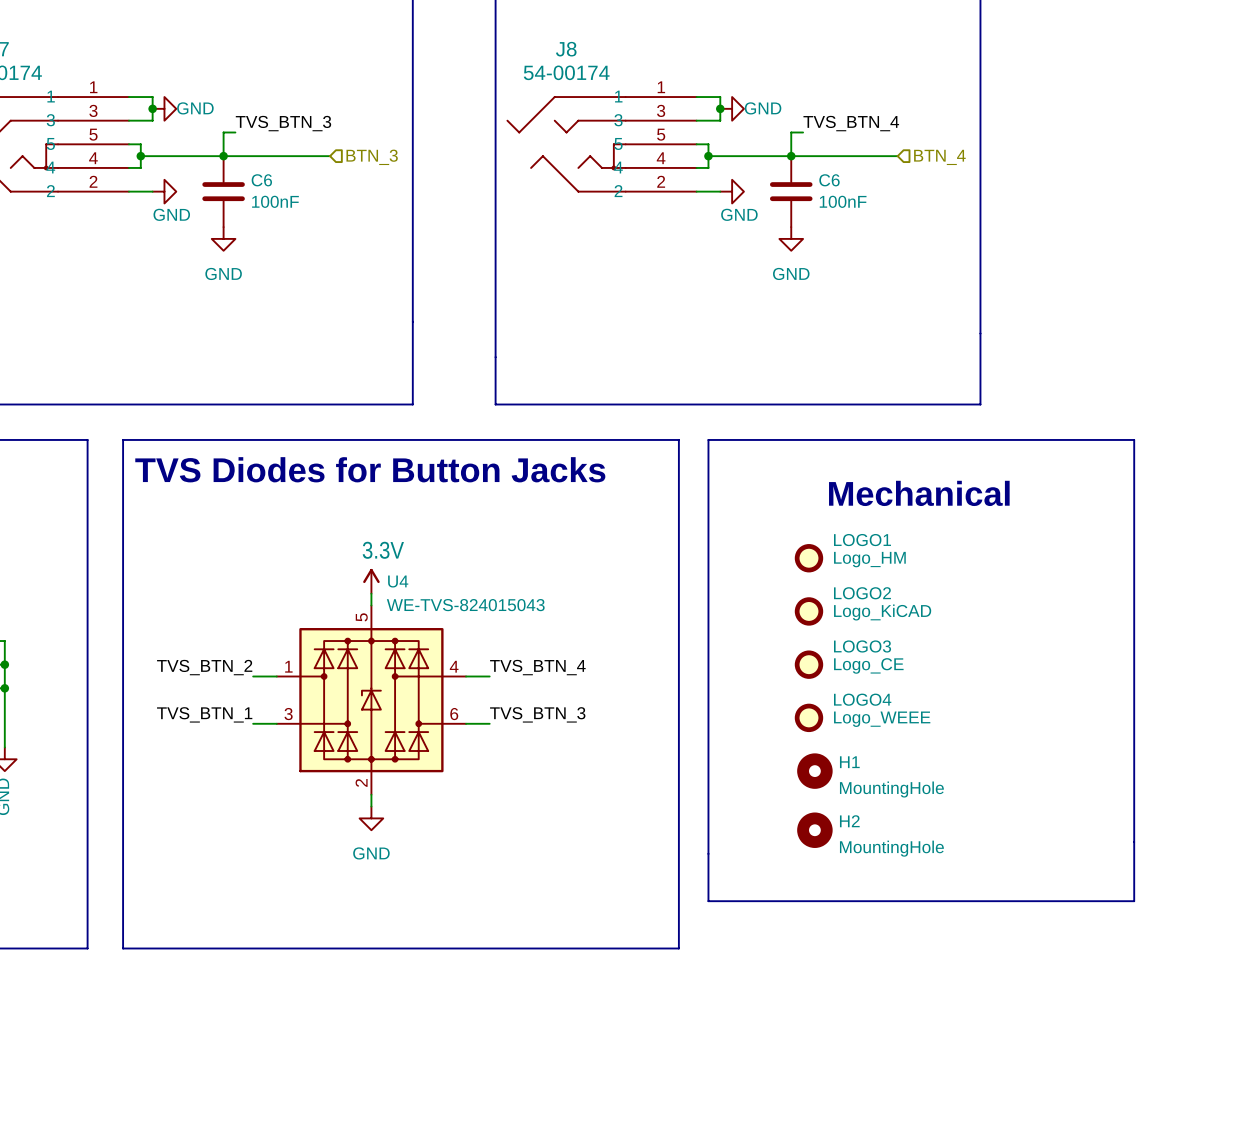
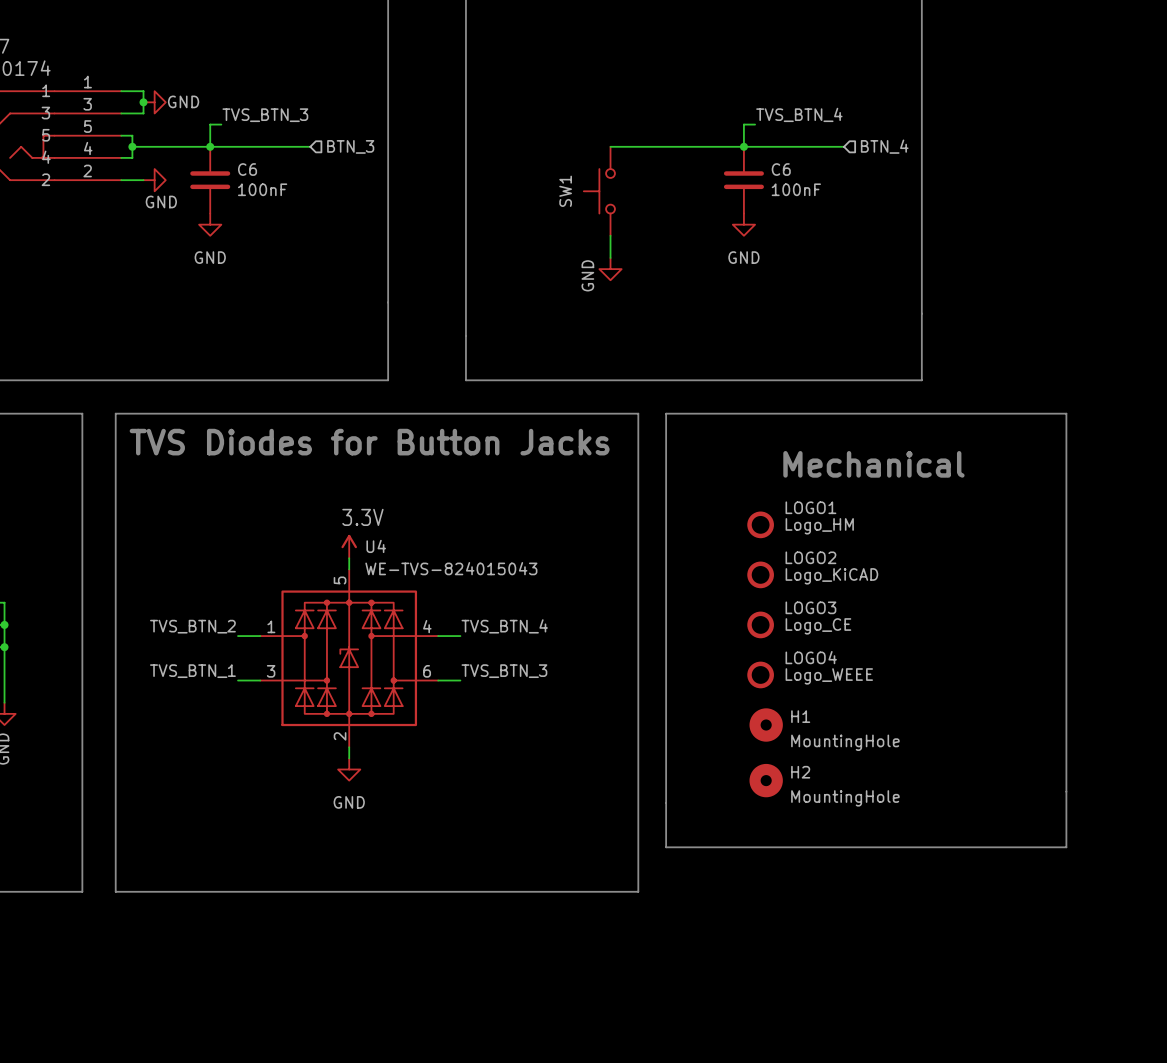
wire: (696, 97) (720, 97) (720, 120) (696, 120) -> none
junction: (720, 108) -> none
power symbol: GND (732, 108) -> none
J8: 54-00174 (601, 144) -> none
wire: (696, 144) (708, 144) (708, 167) (696, 167) -> none
wire: none -> (610, 146) (666, 146)
junction: (708, 156) -> none
wire: (696, 191) (720, 191) -> none
power symbol: GND (732, 191) -> none
SW1: none -> (599, 191)
wire: none -> (610, 235) (610, 258)
power symbol: none -> GND (610, 269)

